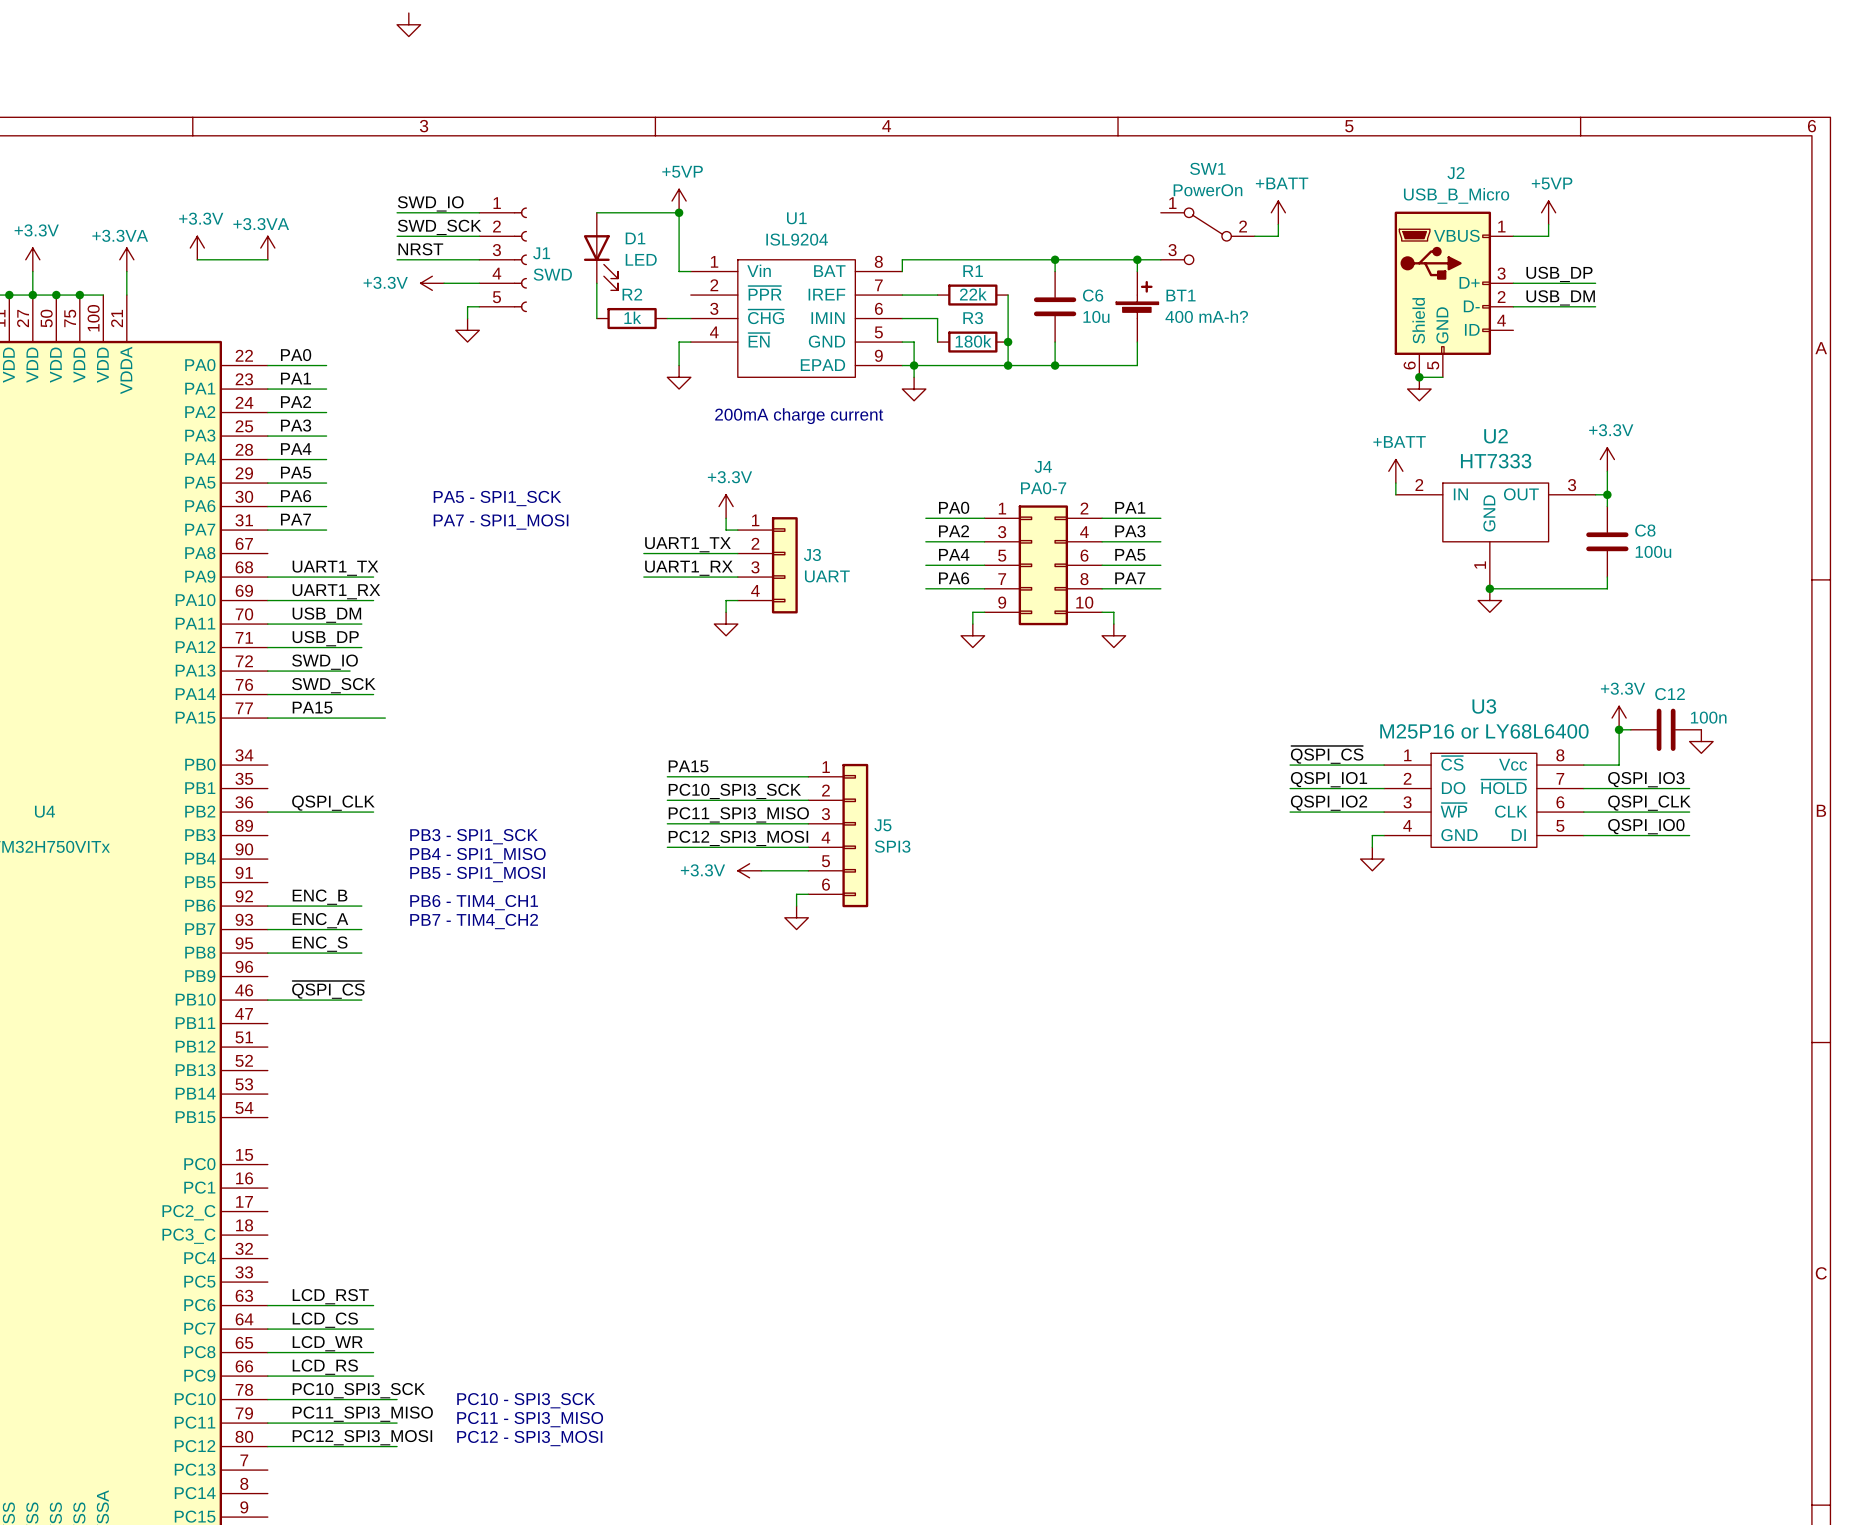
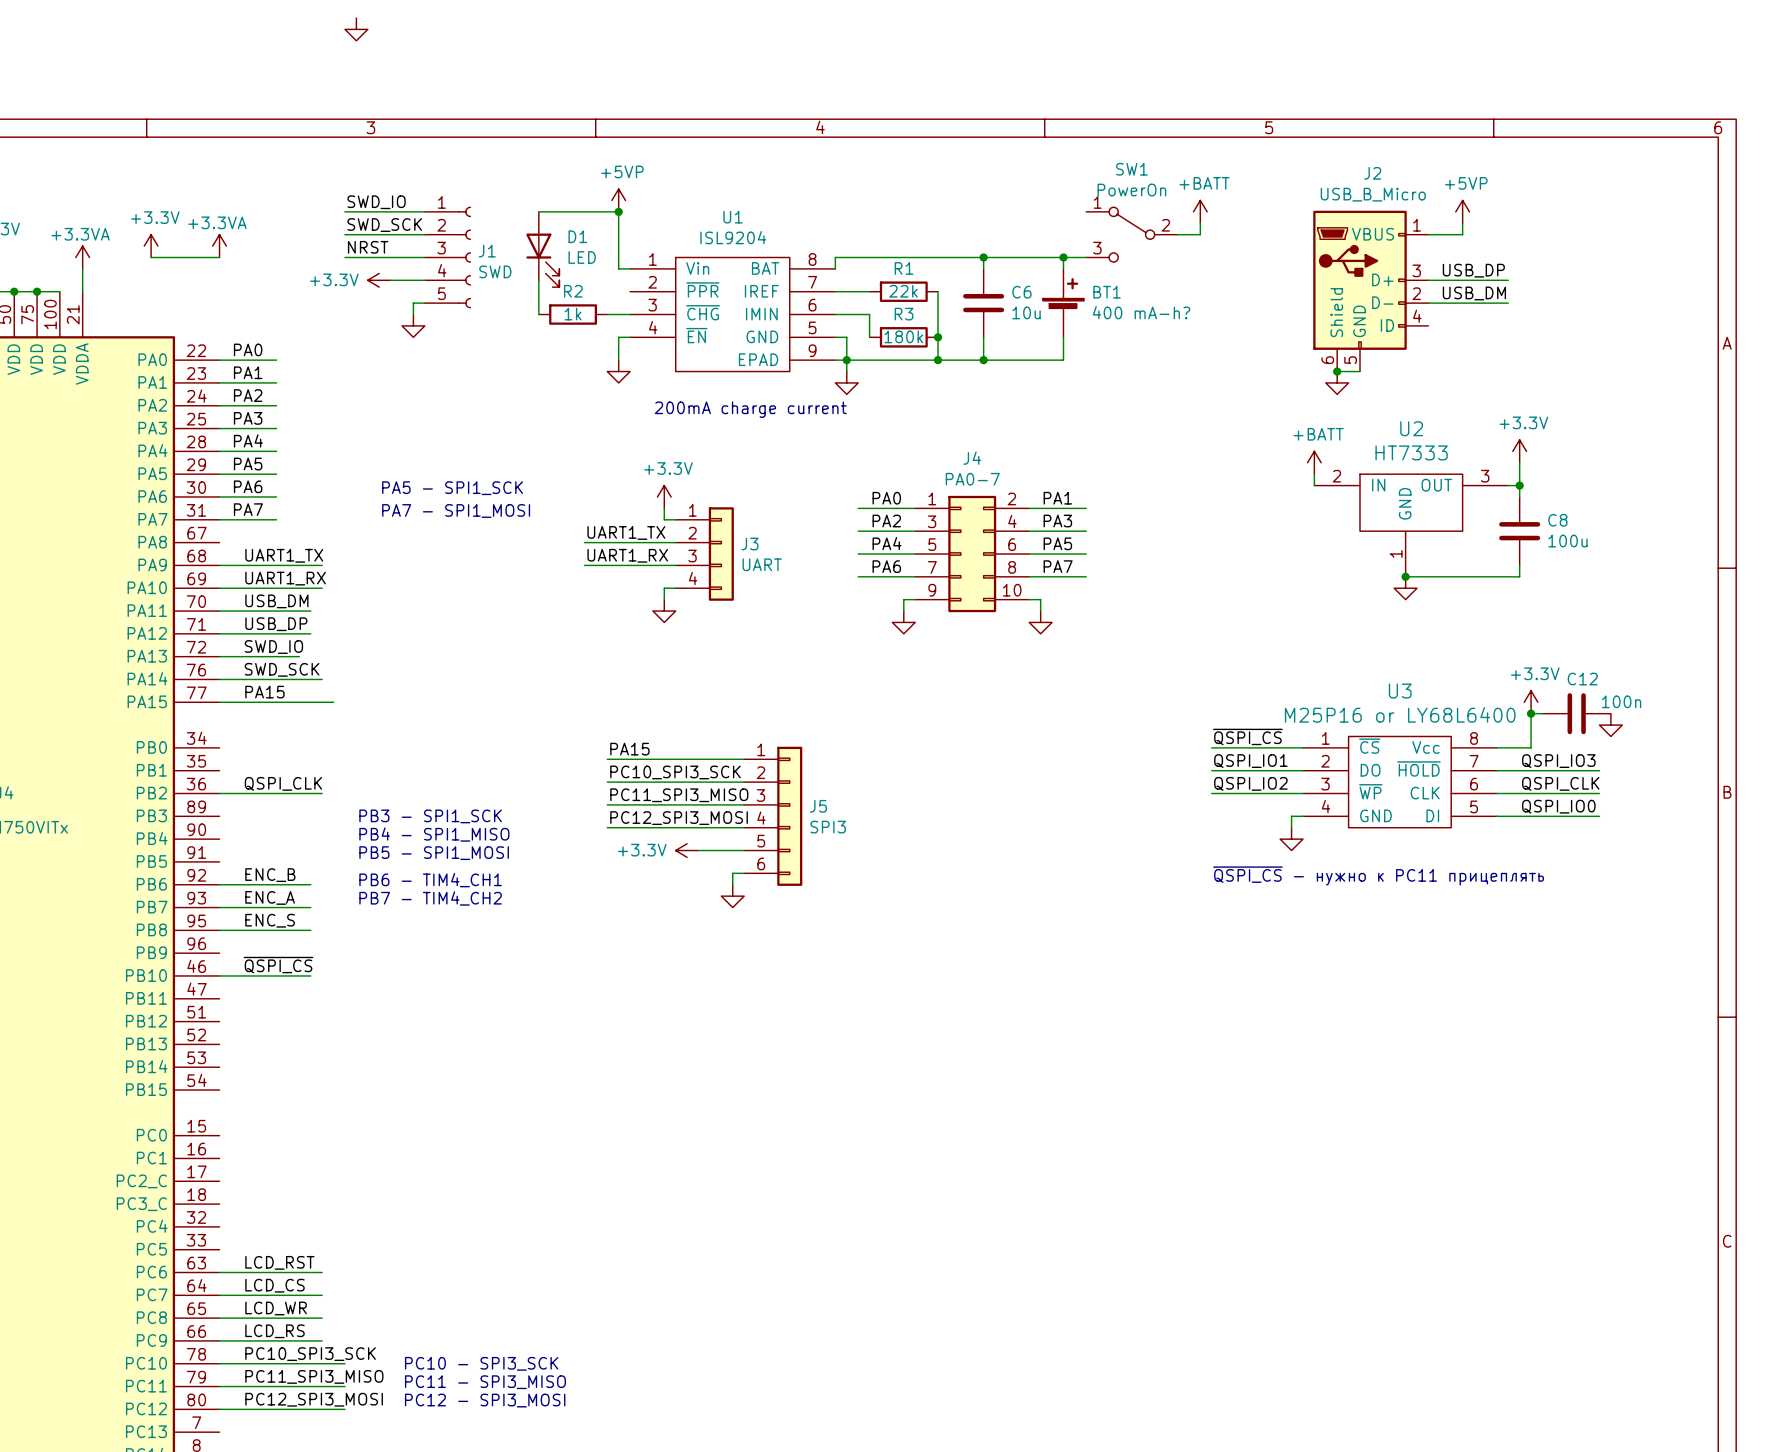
text: none -> ~{QSPI_CS} - нужно к PC11 прицеплять (1378, 875)

